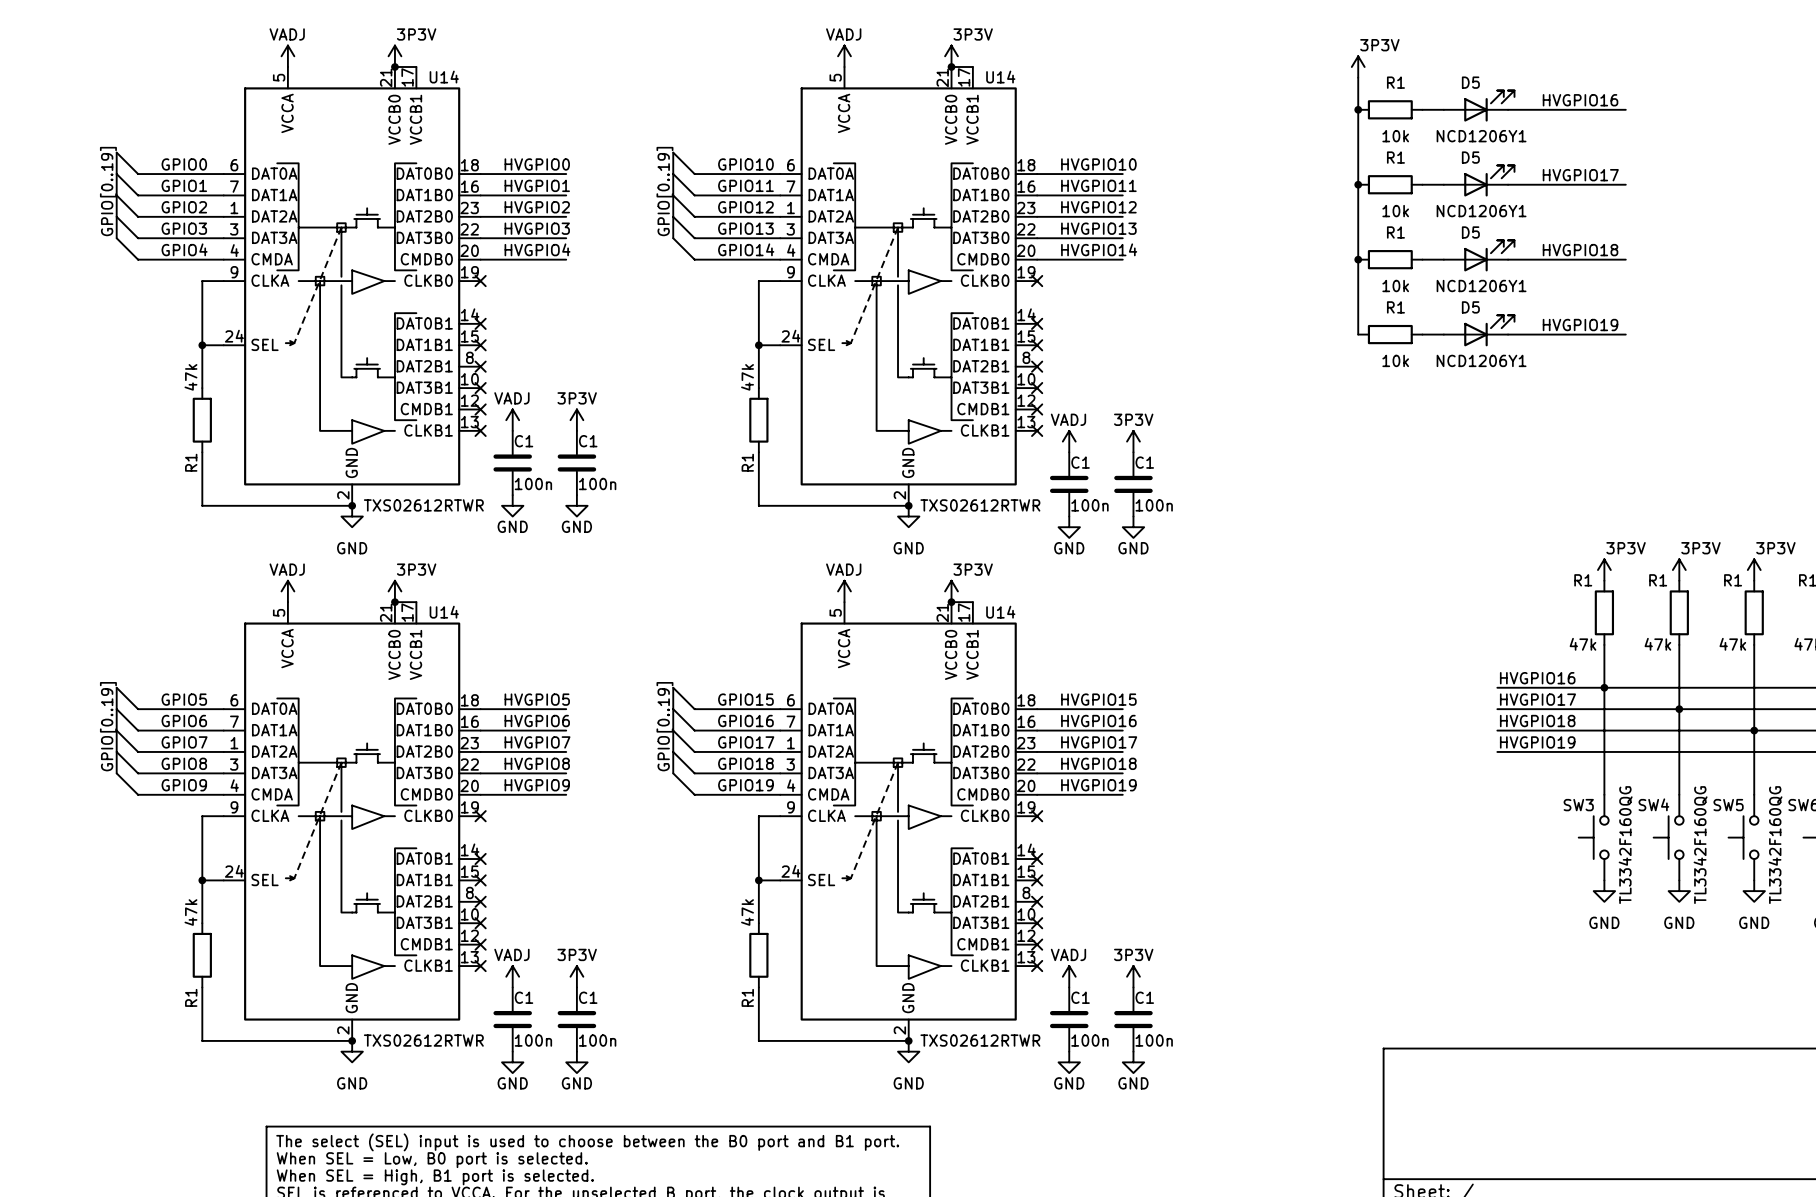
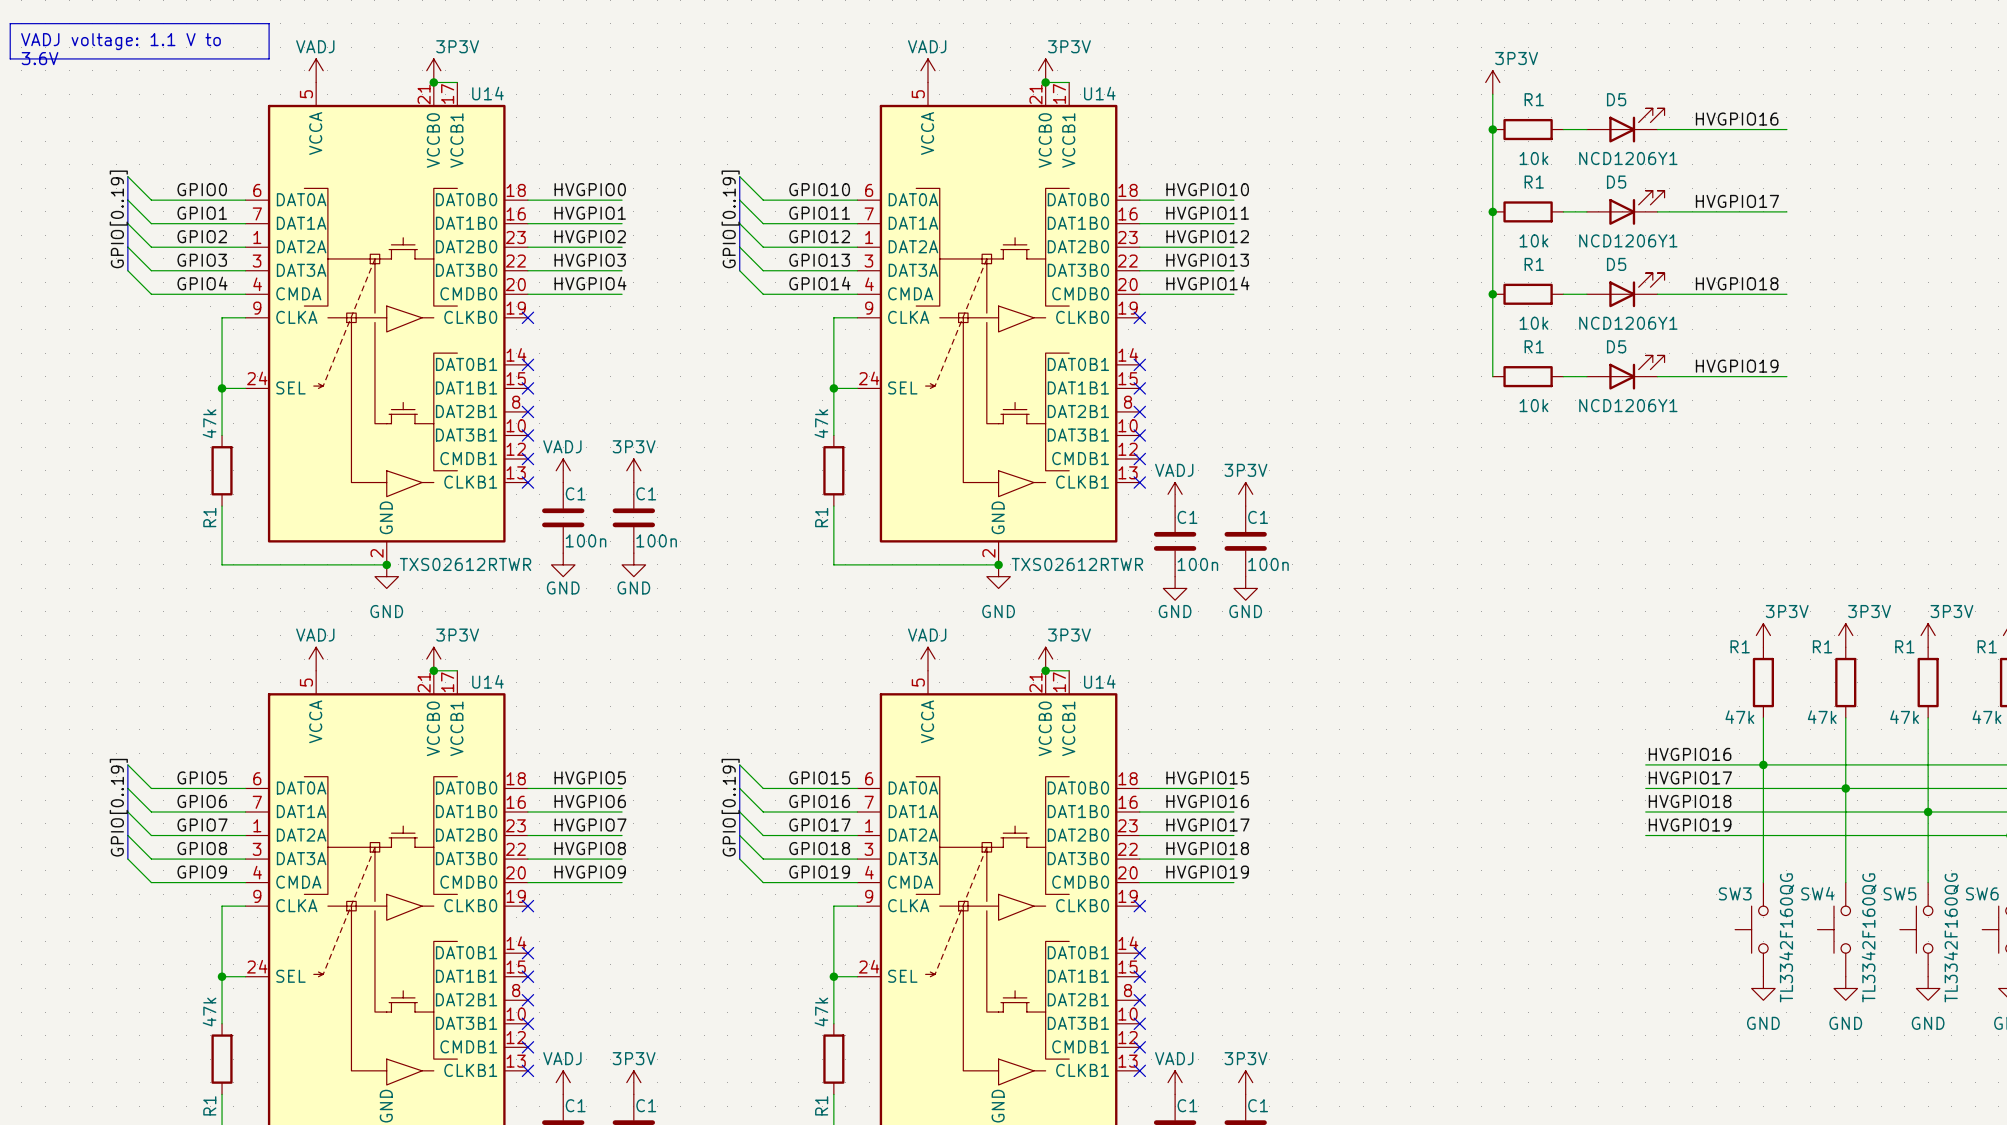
line: none -> (10, 23) (269, 23) (269, 58) (10, 58) (10, 23)
text: none -> VADJ voltage: 1.1 V to (120, 41)
text: none -> 3.6V (40, 58)

